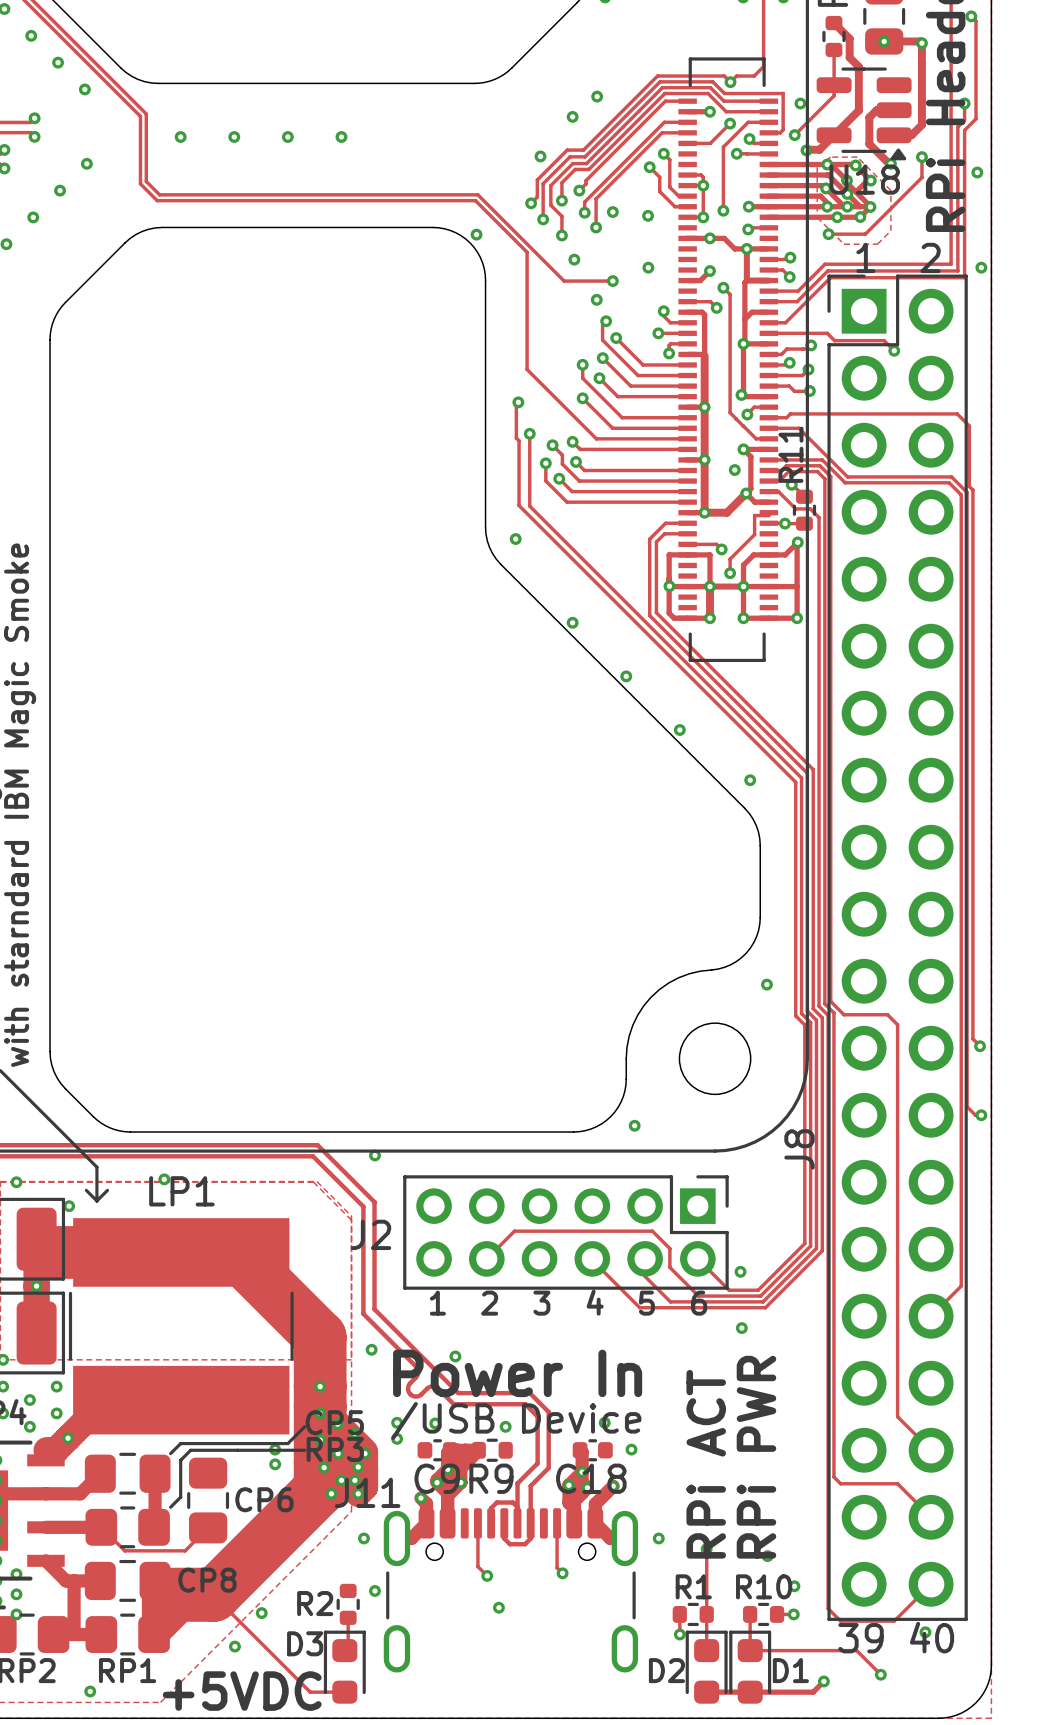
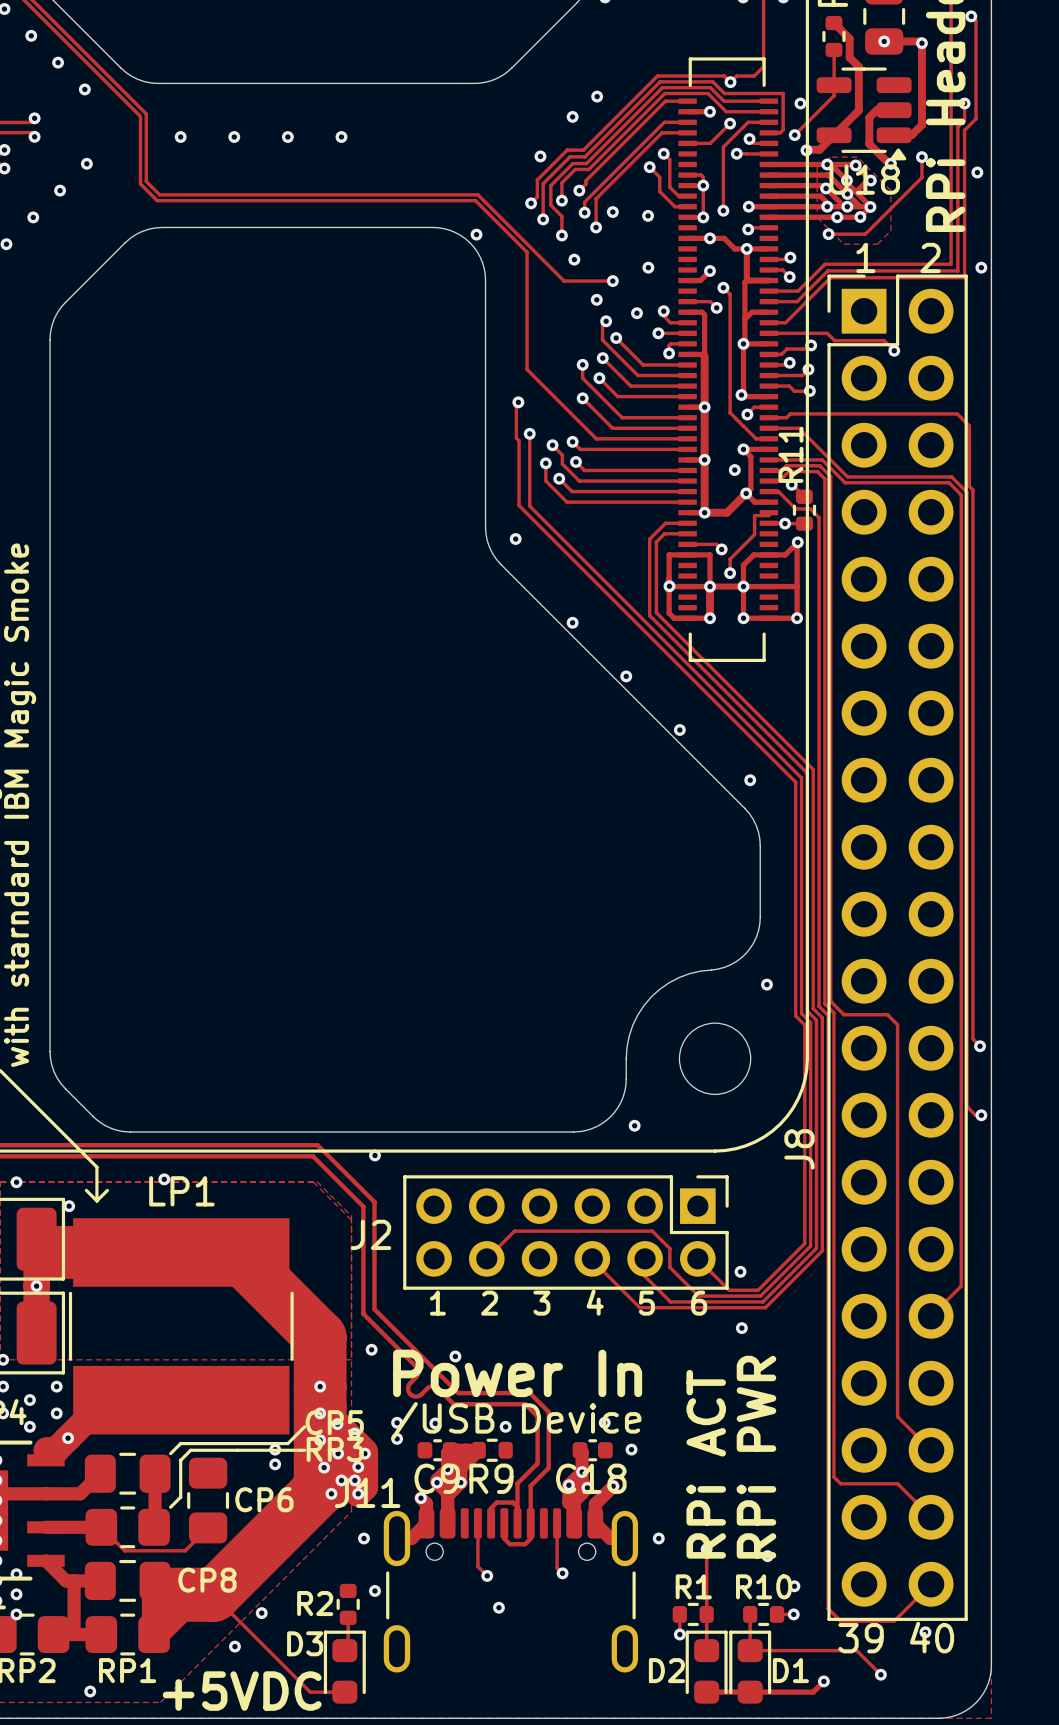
via: none -> (636, 313)

